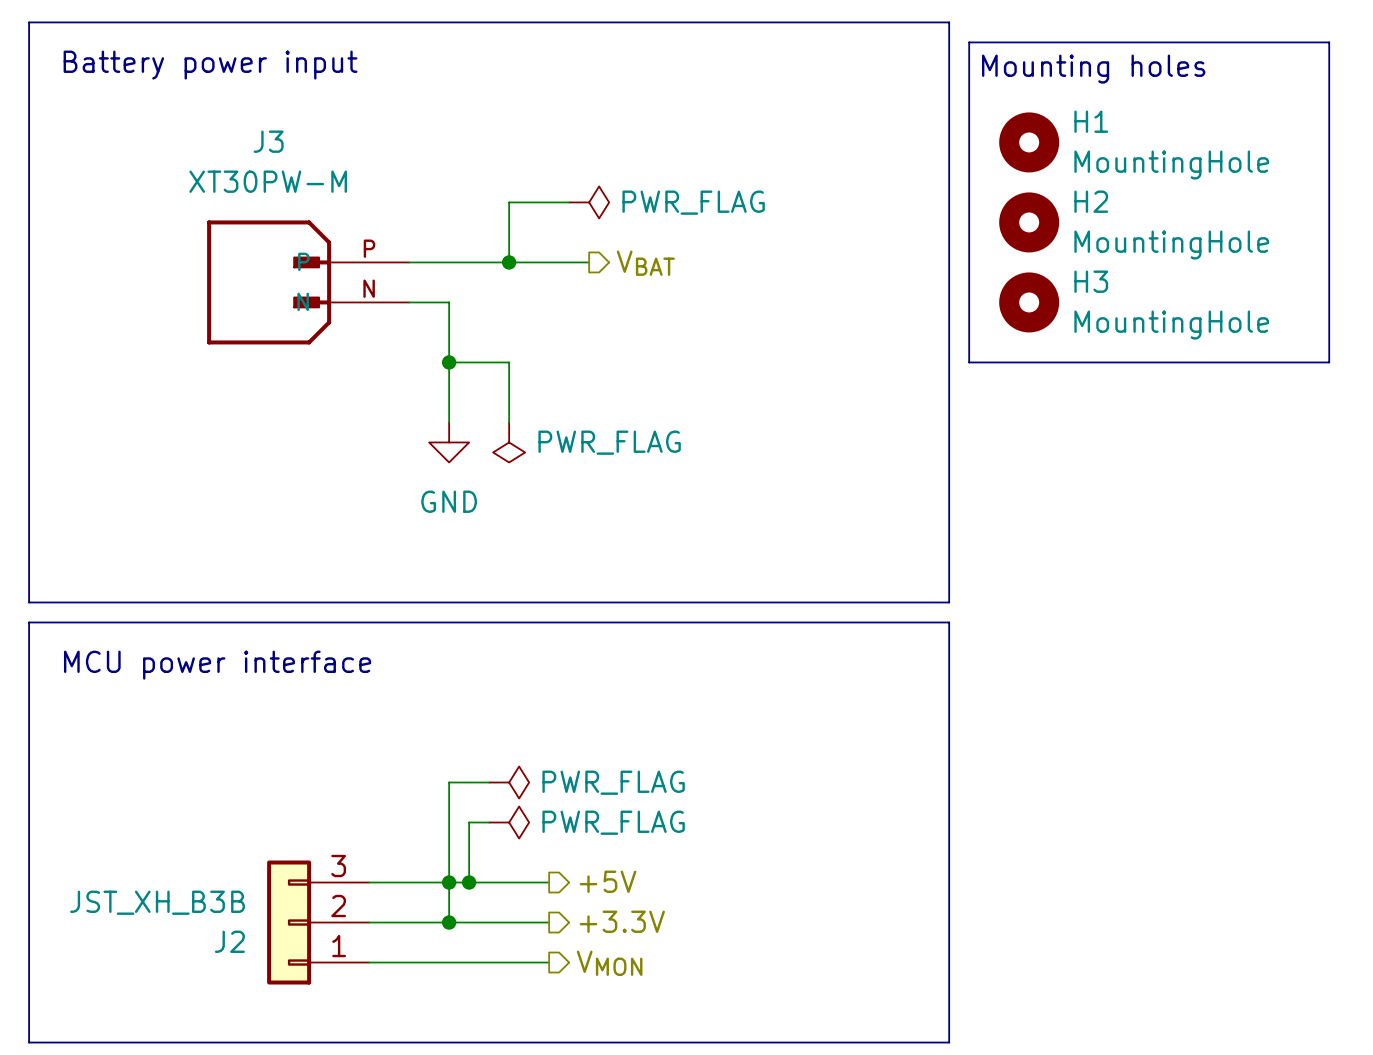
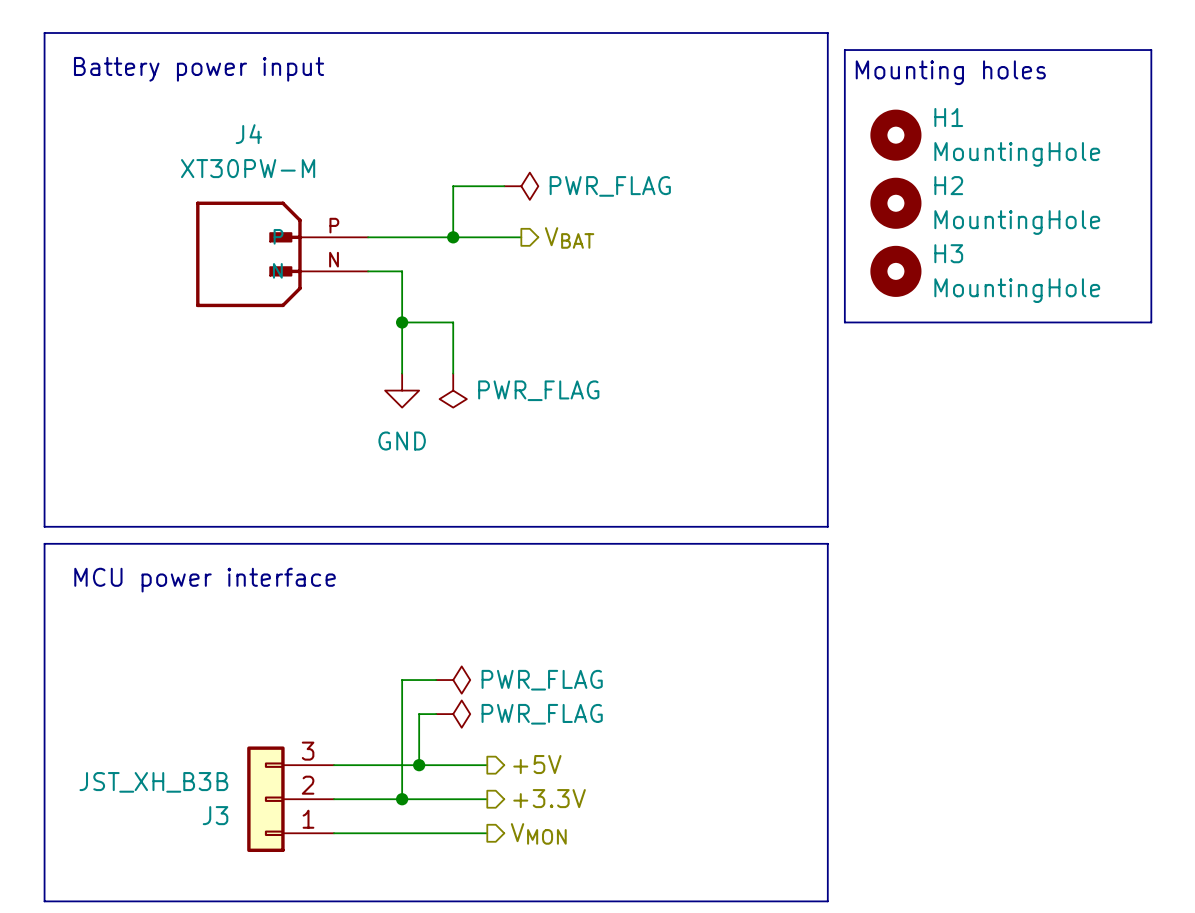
J3 name: J3 (268, 141) -> J4 (248, 134)
junction: (449, 882) -> none
J2 name: J2 (229, 941) -> J3 (215, 815)

